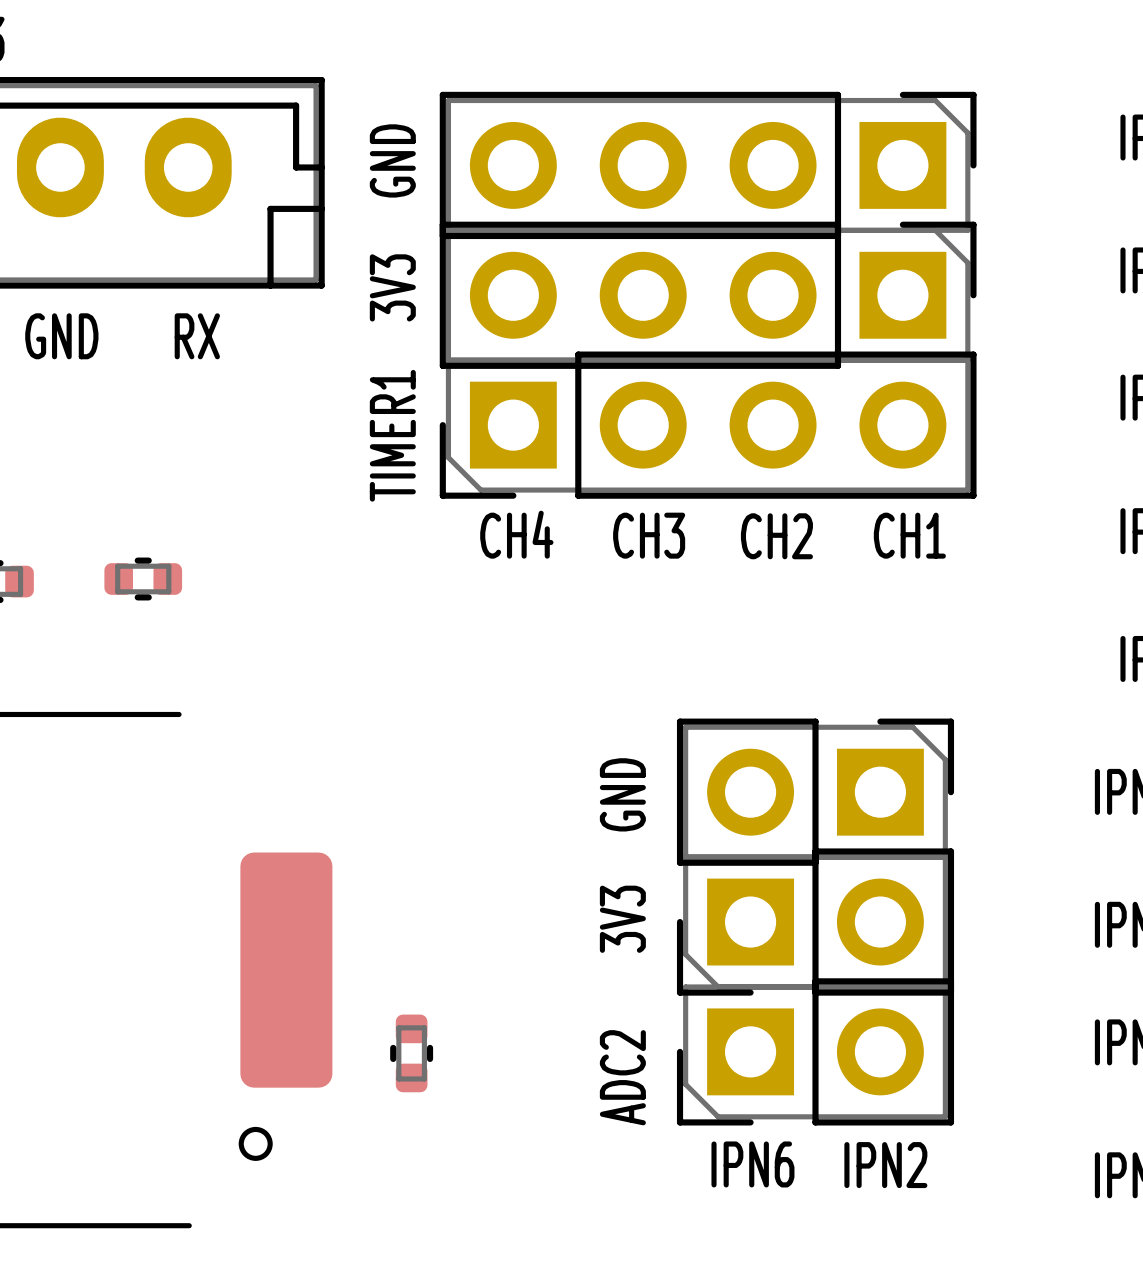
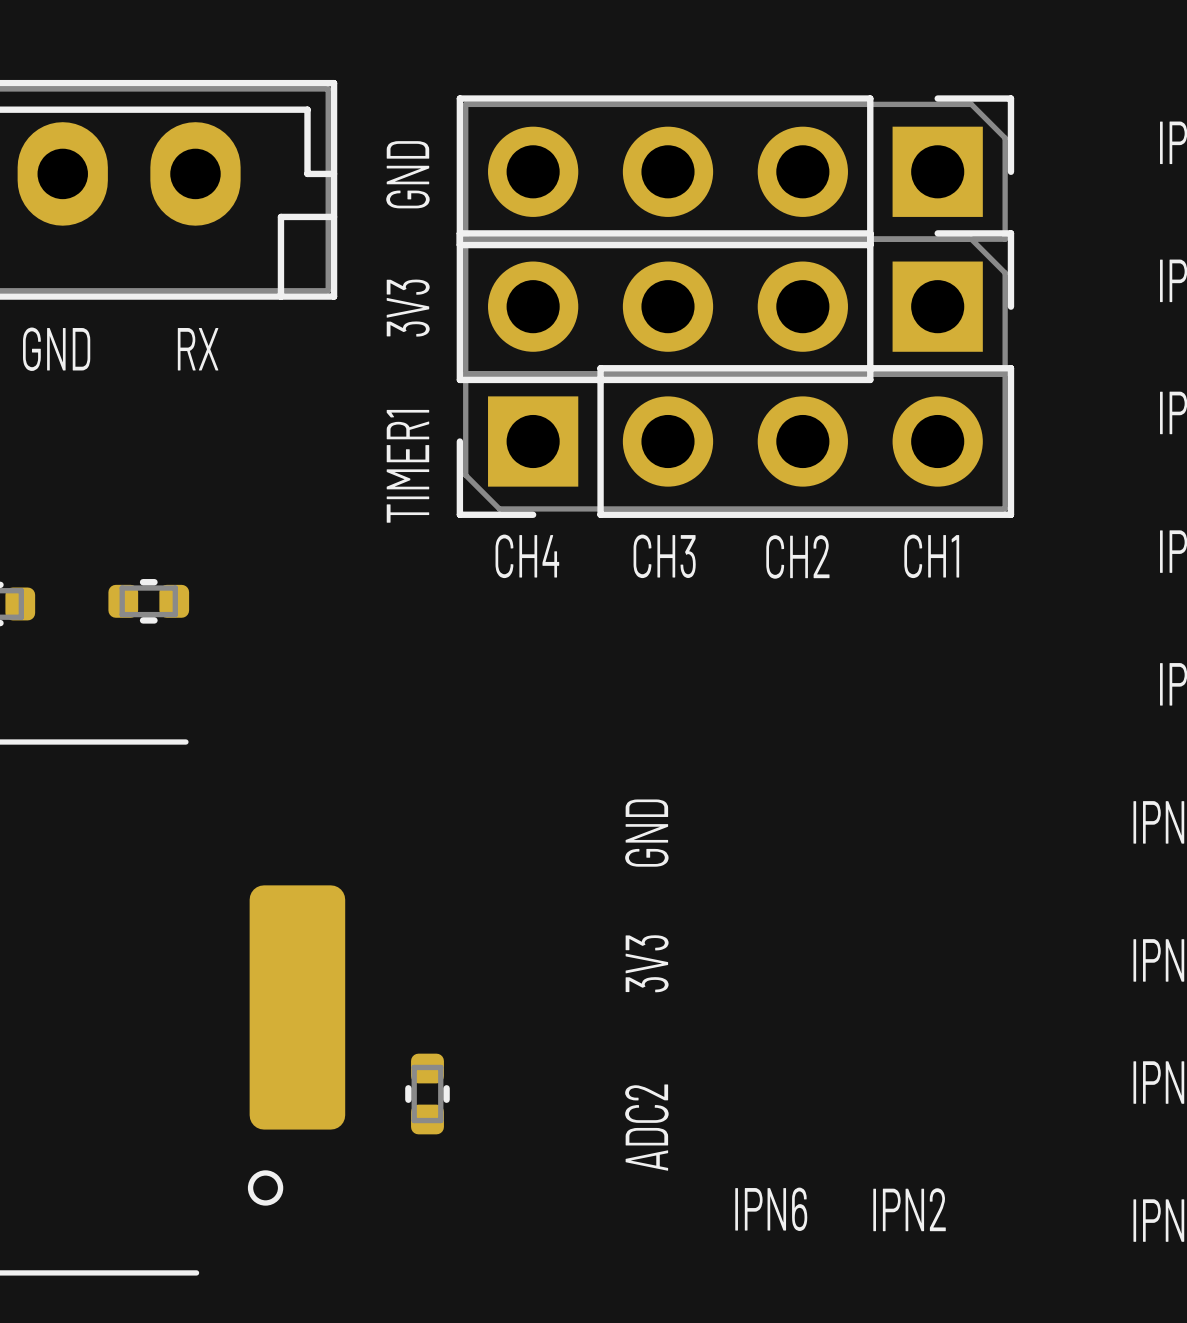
part: (815, 792) -> none
part: (815, 922) -> none
part: (815, 1051) -> none

